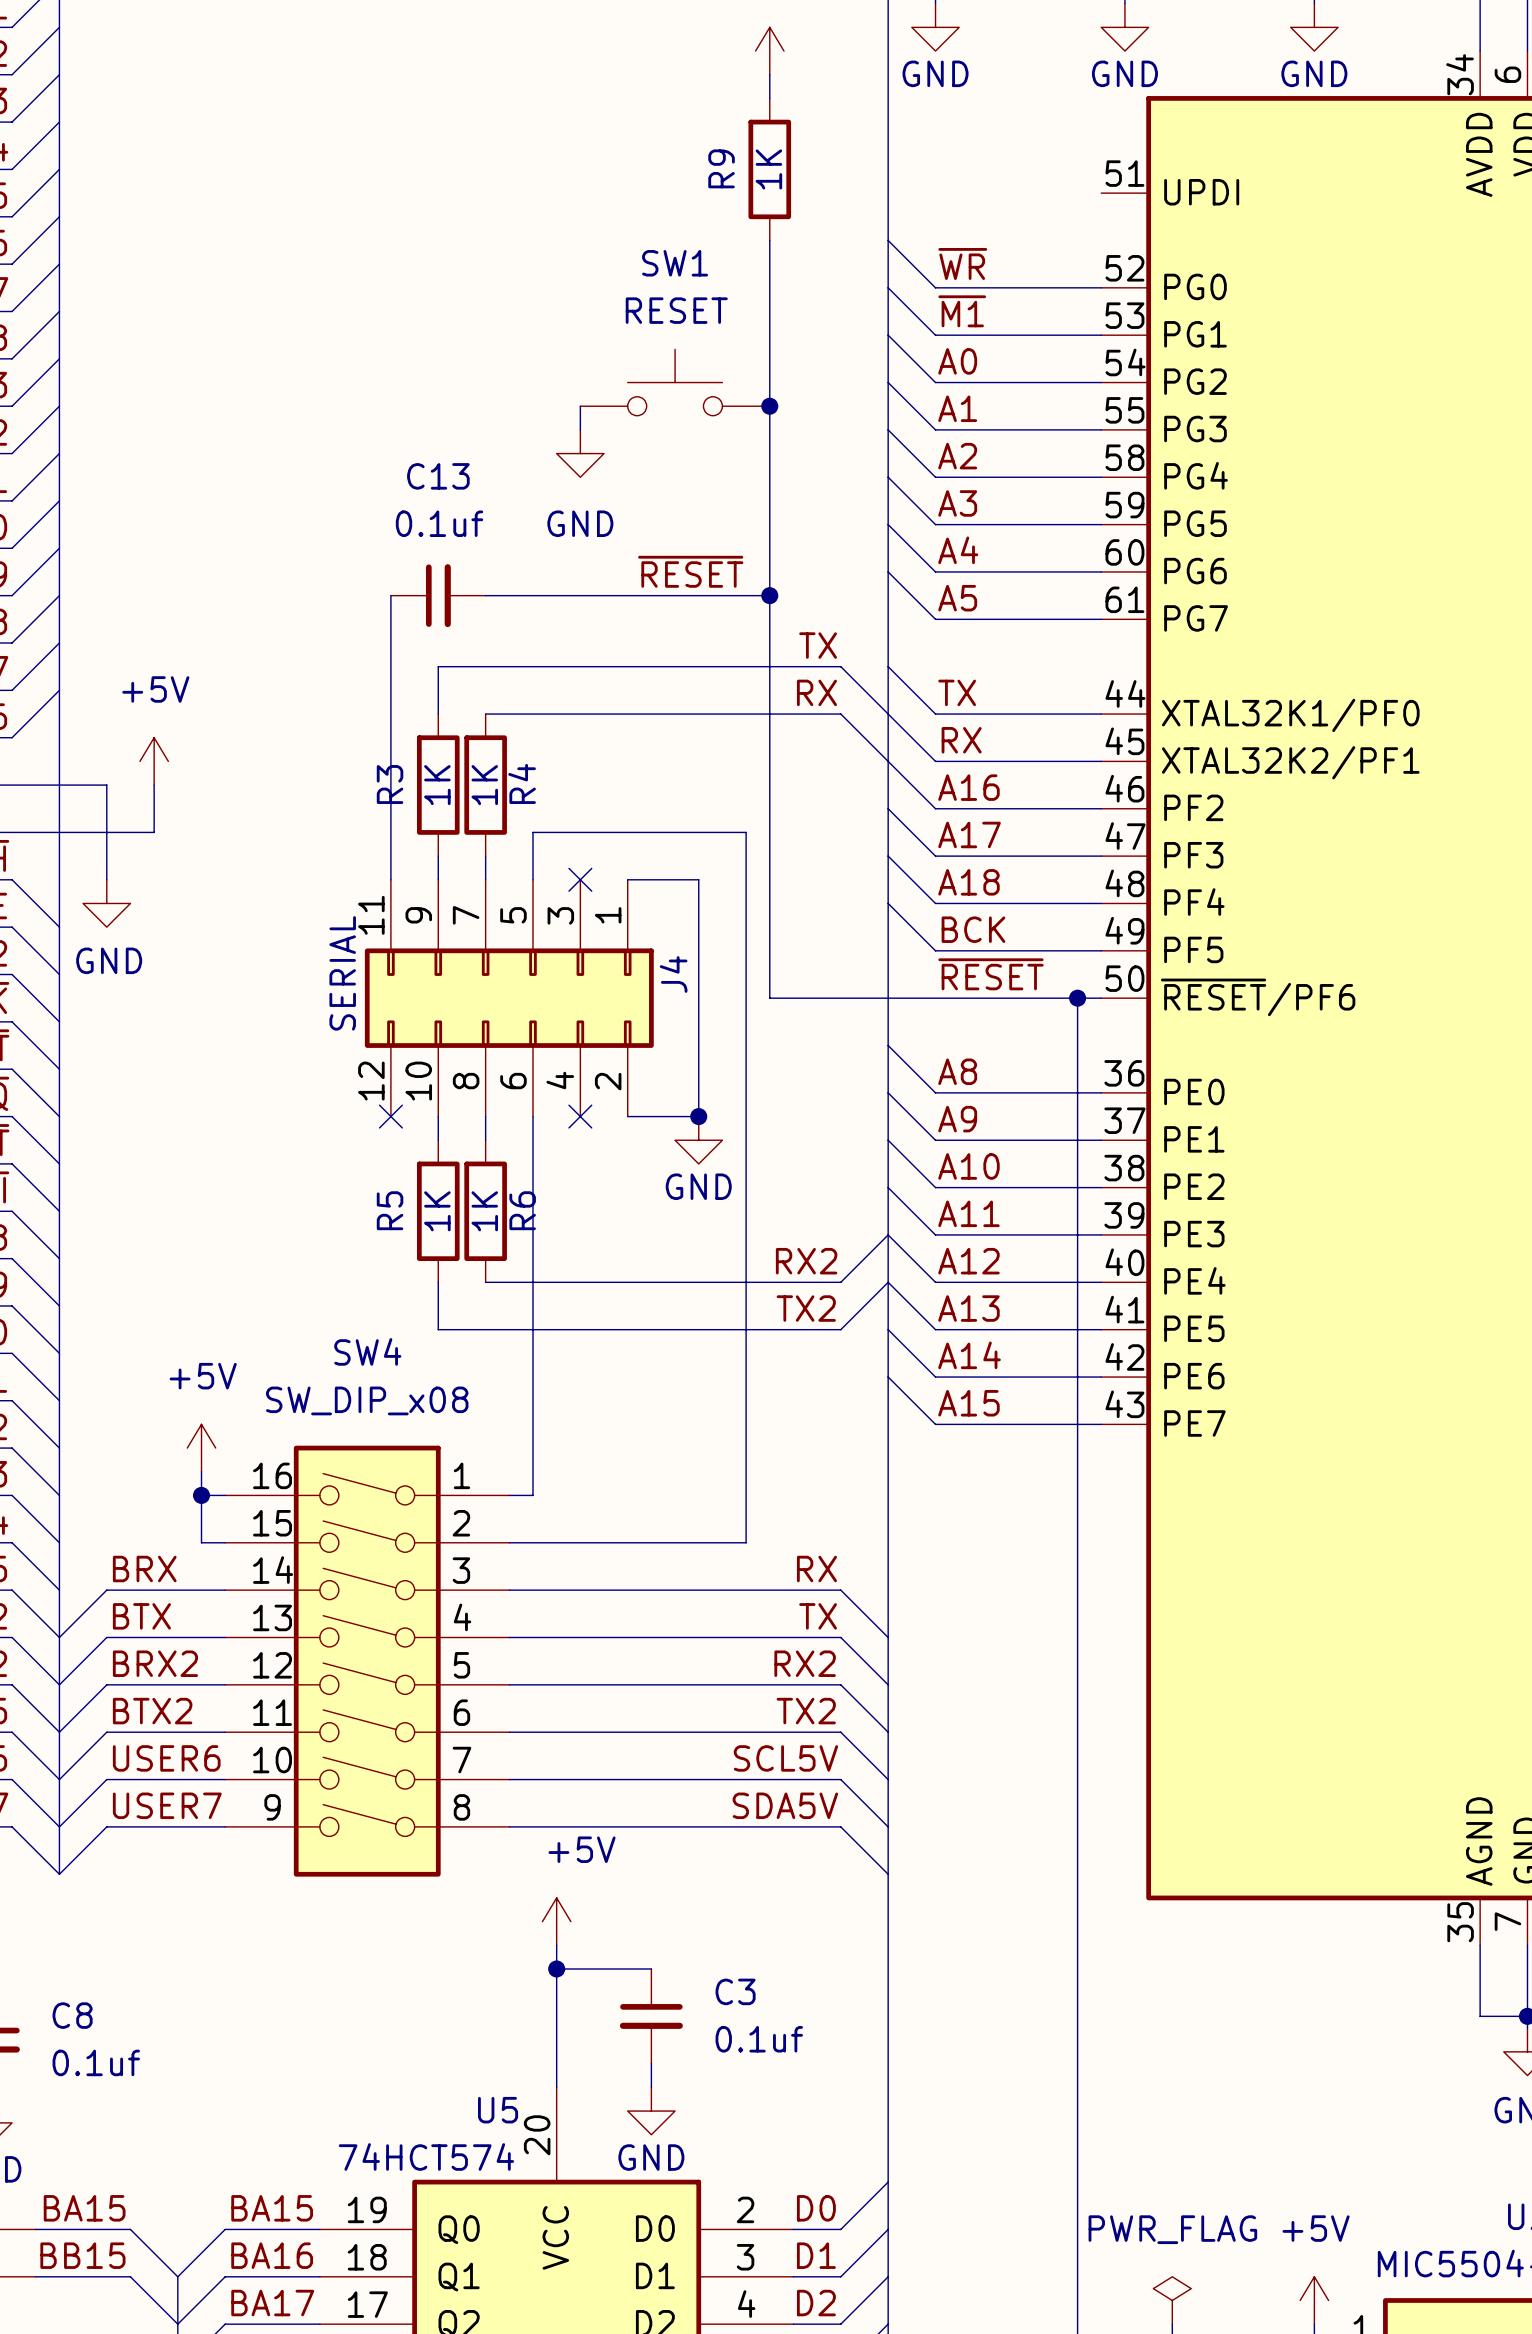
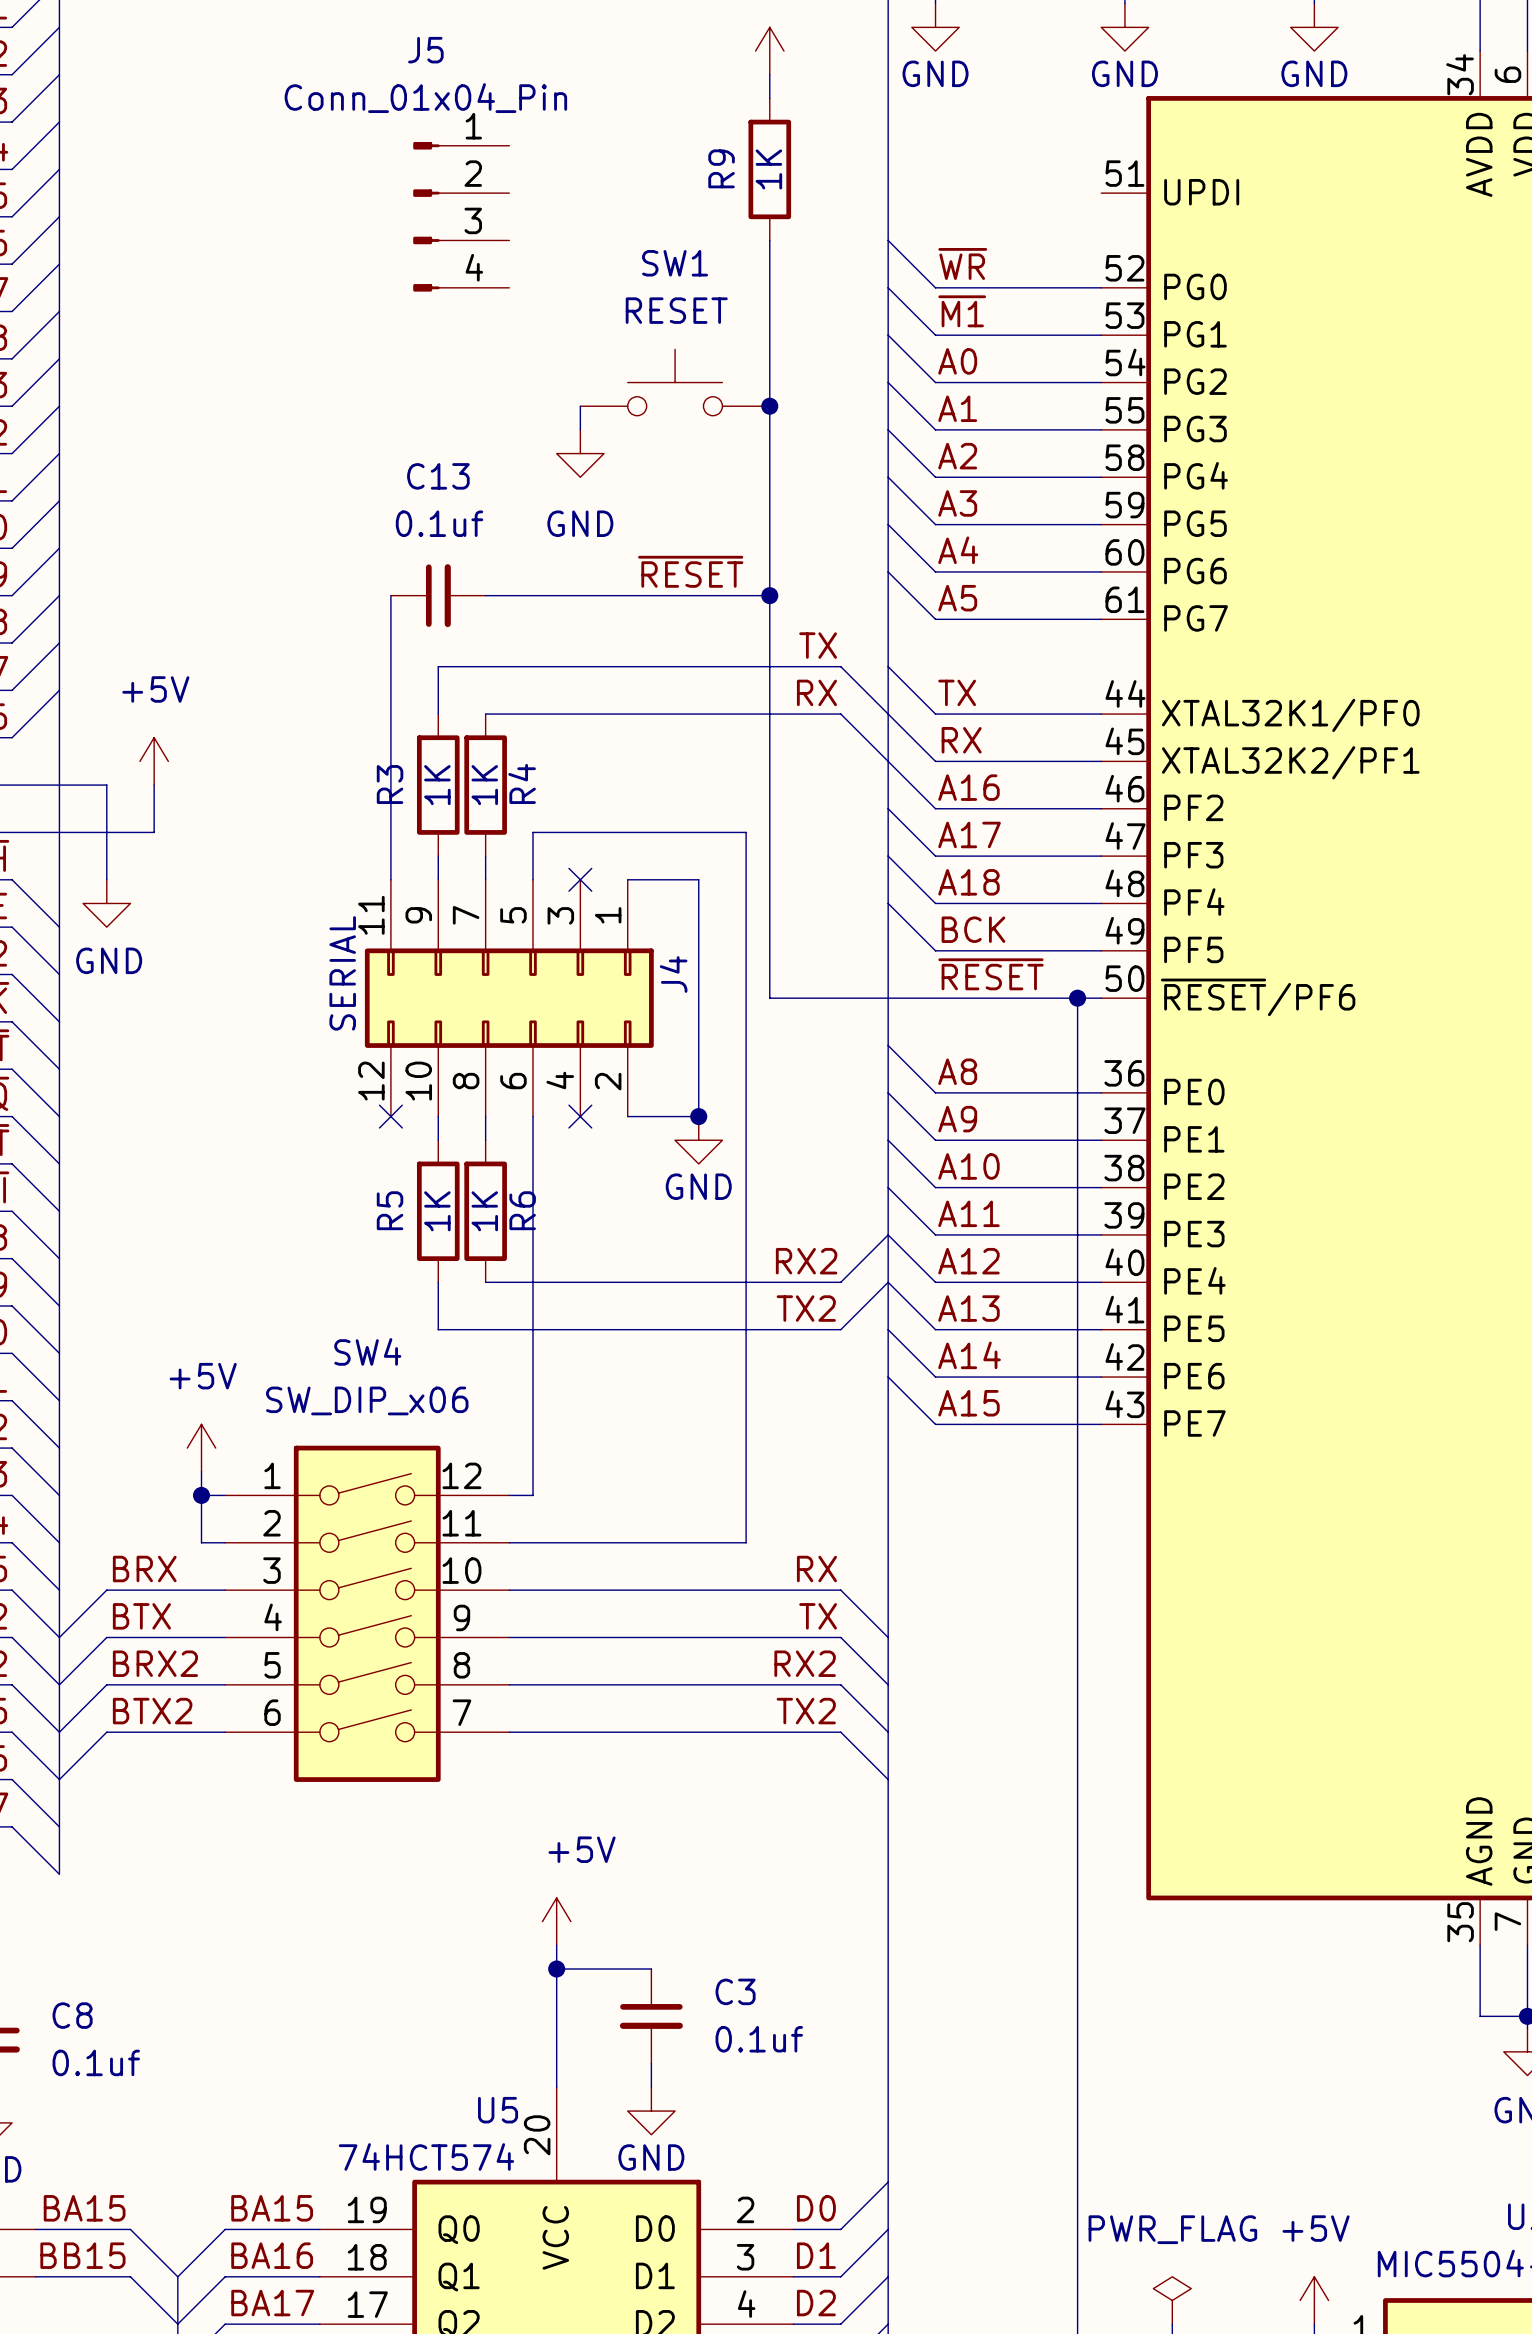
J5: none -> Conn_01x04_Pin (461, 216)
SW4 value: SW_DIP_x08 (367, 1400) -> SW_DIP_x06 (367, 1400)
SW4 symbol: [225, 1445, 510, 1877] -> [225, 1445, 510, 1782]
label: USER6 (166, 1758) -> none
label: SCL5V (785, 1758) -> none
wire: (225, 1779) (106, 1779) (59, 1826) -> none
wire: (509, 1779) (840, 1779) (888, 1826) -> none
label: USER7 (167, 1805) -> none
label: SDA5V (785, 1805) -> none
wire: (225, 1826) (106, 1826) (59, 1874) -> none
wire: (509, 1826) (840, 1826) (888, 1874) -> none

